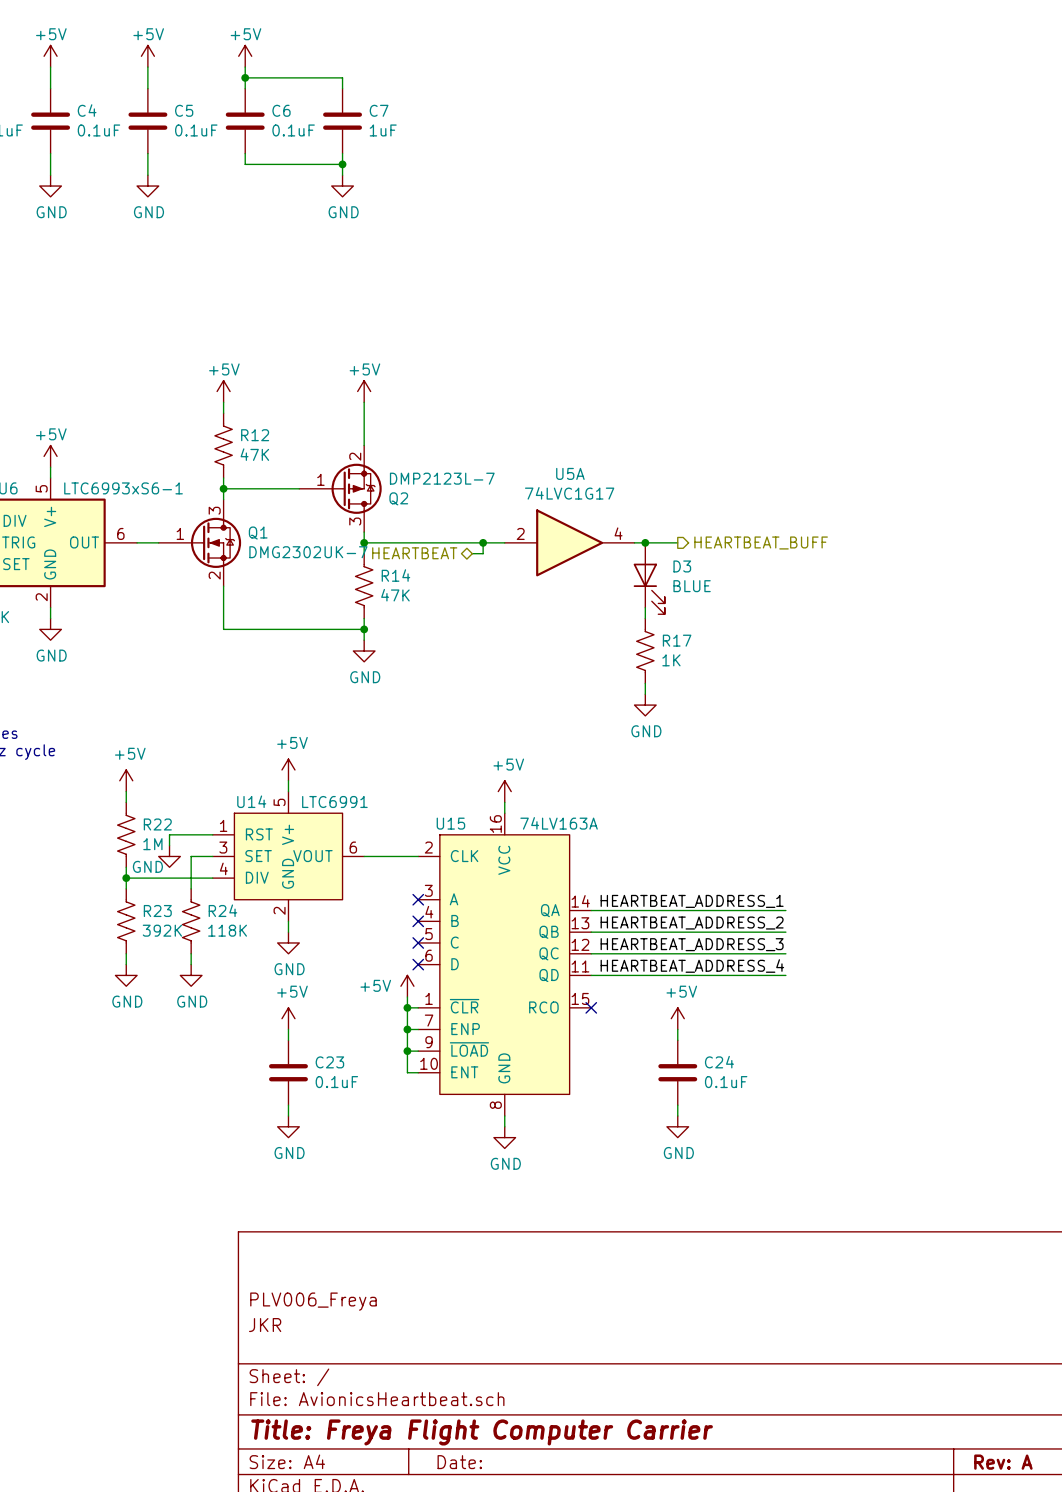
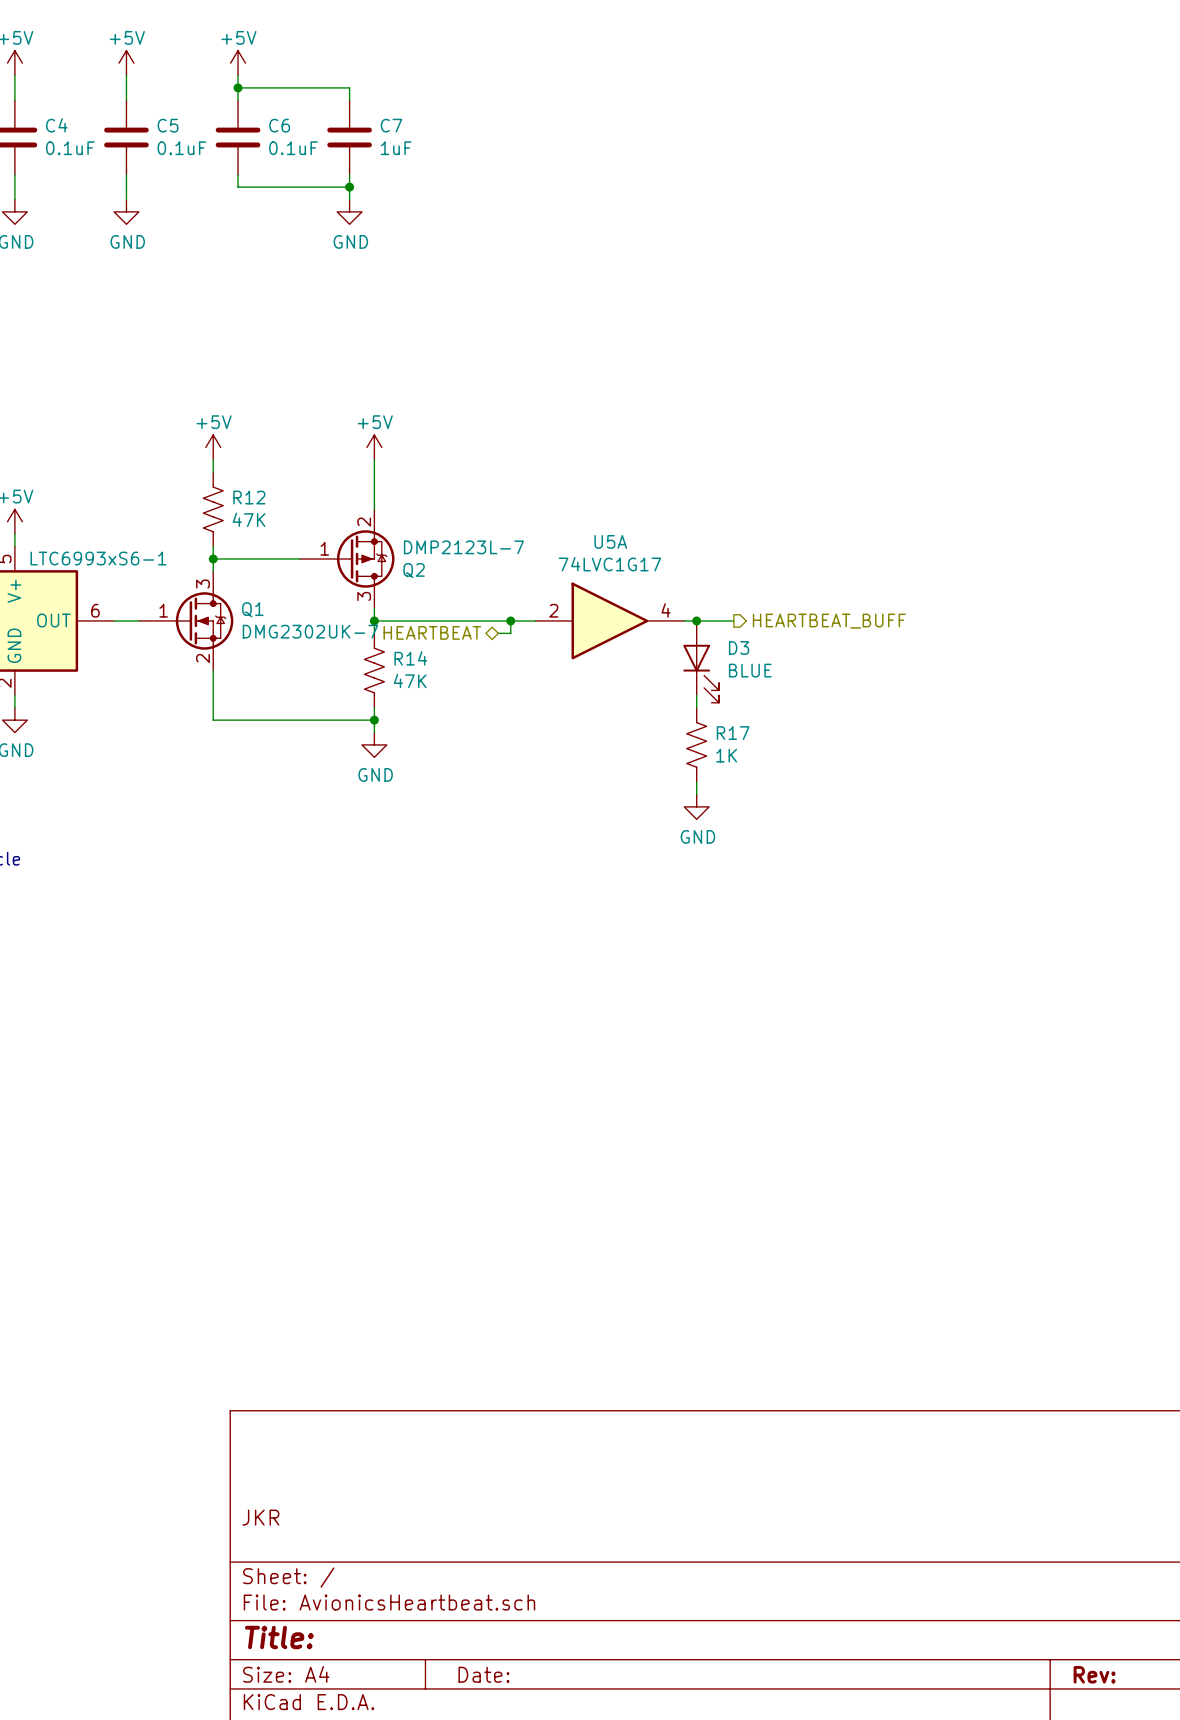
power symbol: +5V (288, 769) -> none
power symbol: +5V (126, 780) -> none
wire: (288, 780) (288, 791) -> none
wire: (126, 791) (126, 802) -> none
power symbol: +5V (504, 791) -> none
wire: (504, 802) (504, 813) -> none
R22: 1M (126, 834) -> none
wire: (212, 834) (169, 834) (169, 845) -> none
power symbol: GND (169, 856) -> none
wire: (212, 856) (191, 856) (191, 888) -> none
U14: LTC6991 (288, 856) -> none
wire: (364, 856) (418, 856) -> none
wire: (126, 867) (126, 888) -> none
wire: (126, 878) (212, 878) -> none
junction: (126, 878) -> none
no-connect mark: (418, 899) -> none
label: HEARTBEAT_ADDRESS_1 (692, 901) -> none
wire: (591, 910) (785, 910) -> none
R23: 392K (126, 921) -> none
R24: 118K (191, 921) -> none
wire: (288, 921) (288, 932) -> none
no-connect mark: (418, 921) -> none
label: HEARTBEAT_ADDRESS_2 (692, 923) -> none
wire: (591, 932) (785, 932) -> none
power symbol: GND (288, 942) -> none
no-connect mark: (418, 942) -> none
label: HEARTBEAT_ADDRESS_3 (692, 944) -> none
wire: (126, 953) (126, 964) -> none
wire: (191, 953) (191, 964) -> none
wire: (591, 953) (785, 953) -> none
no-connect mark: (418, 964) -> none
U15: 74LV163A (504, 964) -> none
label: HEARTBEAT_ADDRESS_4 (692, 966) -> none
power symbol: GND (126, 975) -> none
power symbol: GND (191, 975) -> none
wire: (591, 975) (785, 975) -> none
power symbol: +5V (407, 986) -> none
wire: (407, 997) (407, 1072) (418, 1072) -> none
wire: (407, 1007) (418, 1007) -> none
junction: (407, 1007) -> none
no-connect mark: (591, 1007) -> none
power symbol: +5V (288, 1018) -> none
power symbol: +5V (677, 1018) -> none
wire: (288, 1029) (288, 1040) -> none
wire: (407, 1029) (418, 1029) -> none
junction: (407, 1029) -> none
wire: (677, 1029) (677, 1040) -> none
wire: (407, 1051) (418, 1051) -> none
junction: (407, 1051) -> none
C23: 0.1uF (288, 1072) -> none
C24: 0.1uF (677, 1072) -> none
wire: (288, 1105) (288, 1115) -> none
wire: (677, 1105) (677, 1115) -> none
wire: (504, 1115) (504, 1126) -> none
power symbol: GND (288, 1126) -> none
power symbol: GND (677, 1126) -> none
power symbol: GND (504, 1137) -> none
title block: PLV006_Freya (313, 1301) -> none
title block: Title: Freya Flight Computer Carrier (482, 1432) -> Title: (279, 1637)
title block: Rev: A (1003, 1462) -> Rev: (1094, 1674)

